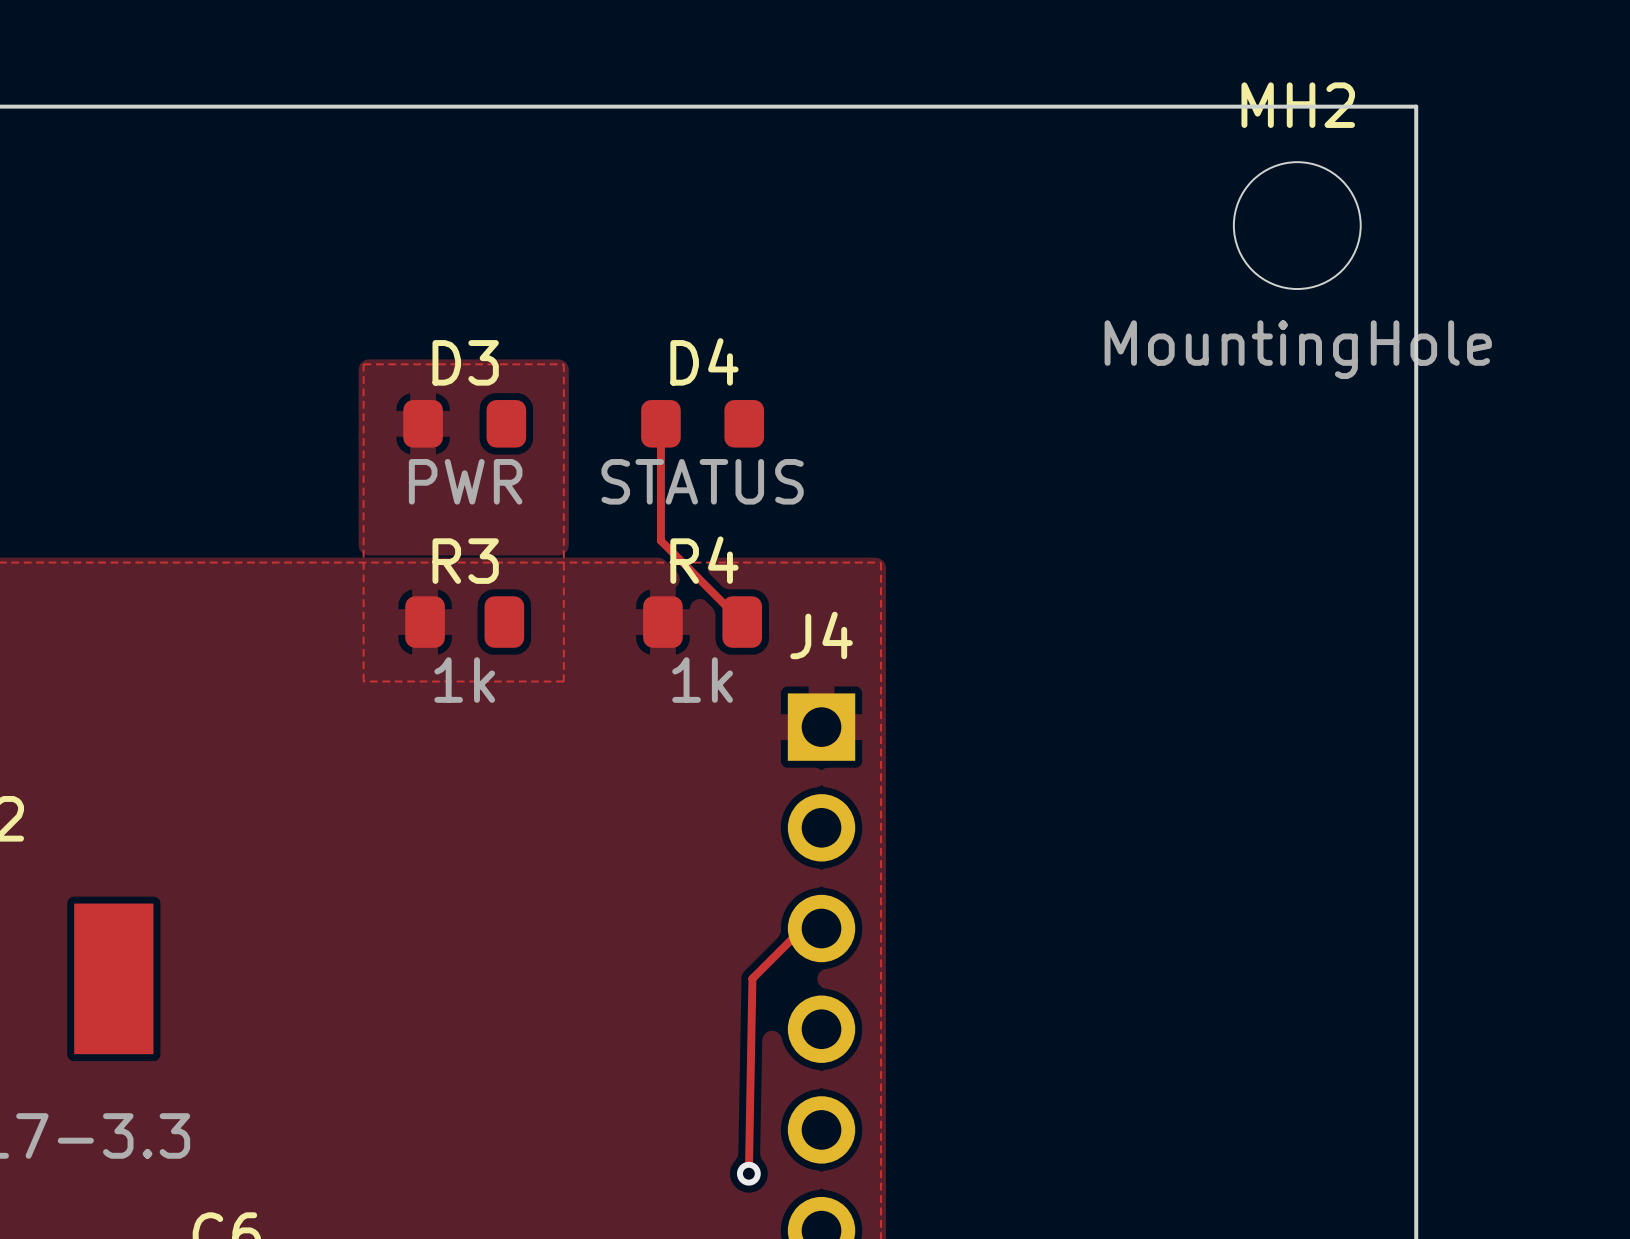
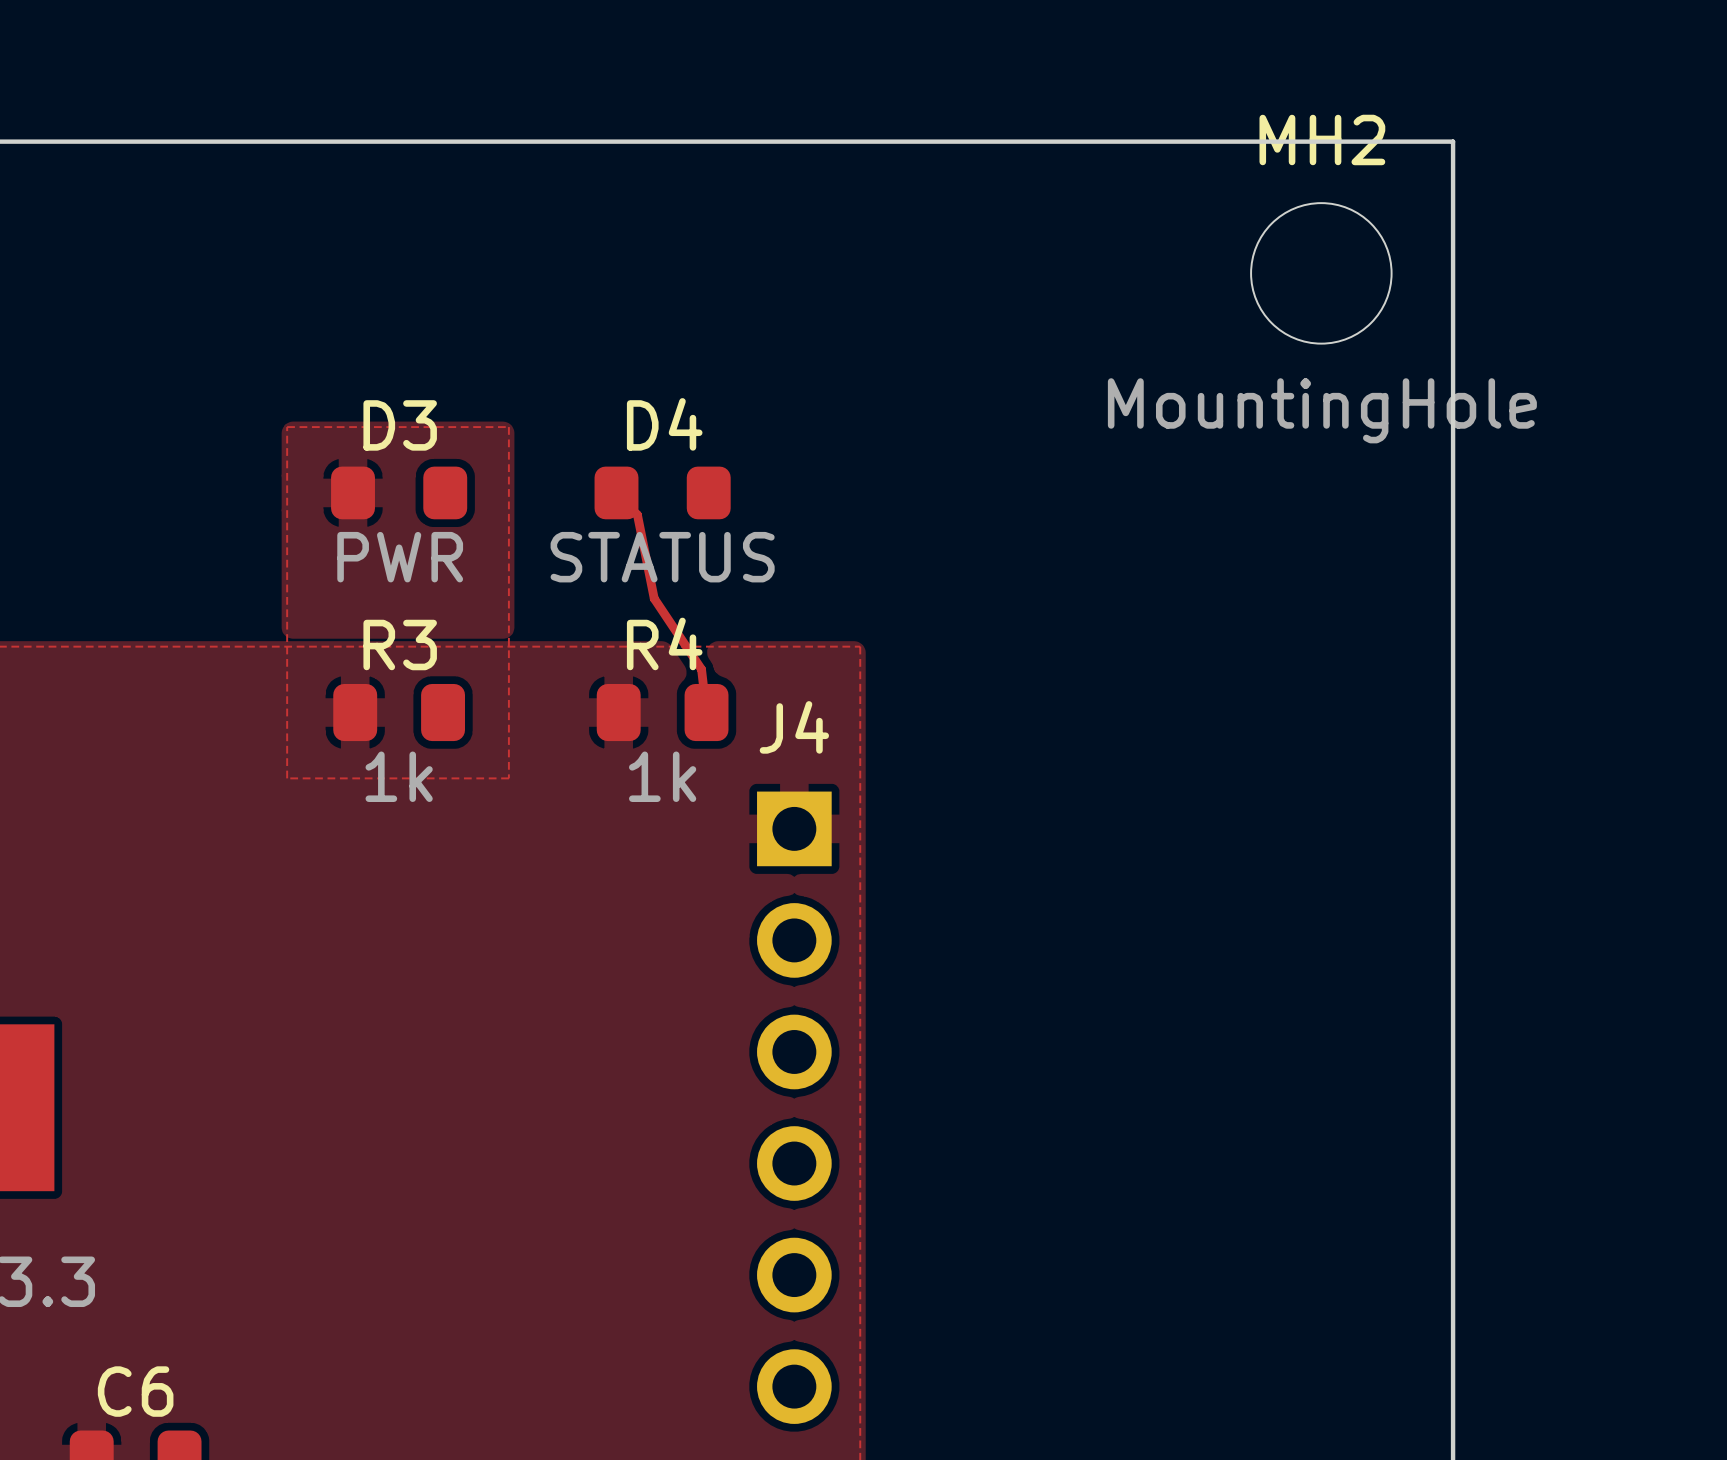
track: (660, 423) (660, 540) (742, 622) -> (616, 492) (637, 514) (654, 598) (701, 669) (706, 712)
track: (821, 928) (794, 936) (752, 978) (748, 1173) -> none
via: (748, 1173) -> none

